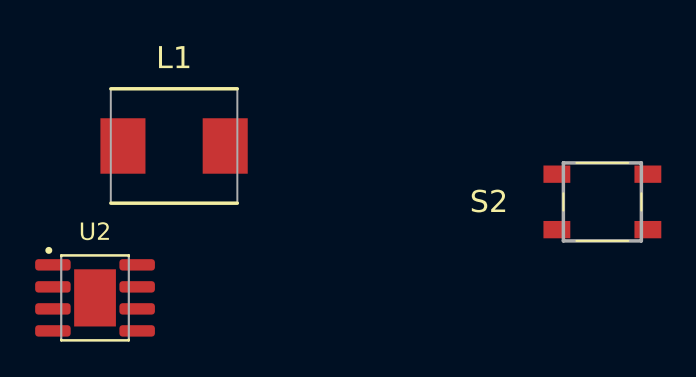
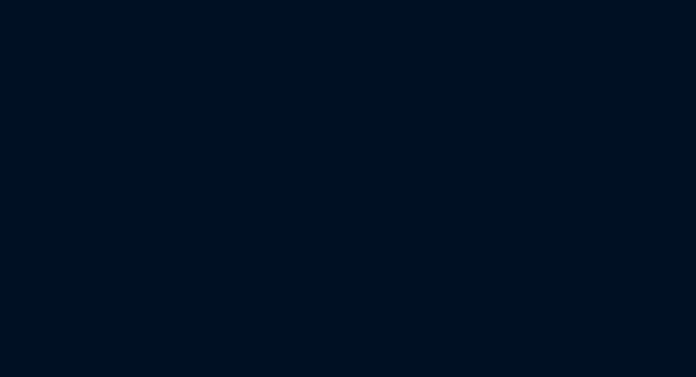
L1: (174, 145) -> none
S2: (602, 201) -> none
U2: (95, 294) -> none

